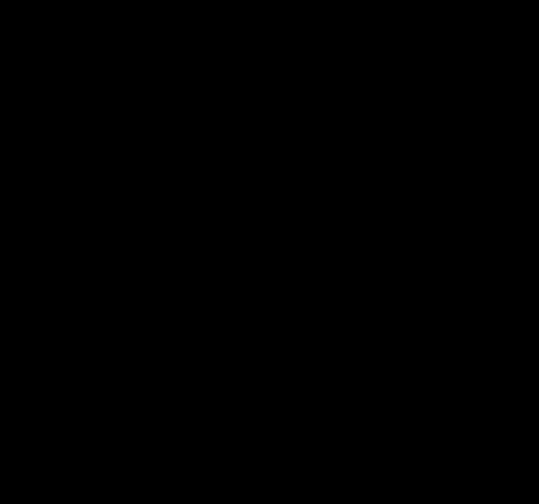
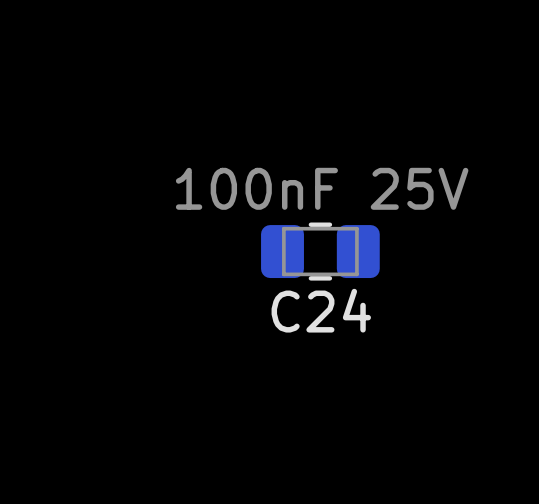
C24: none -> 100nF 25V (320, 251)

